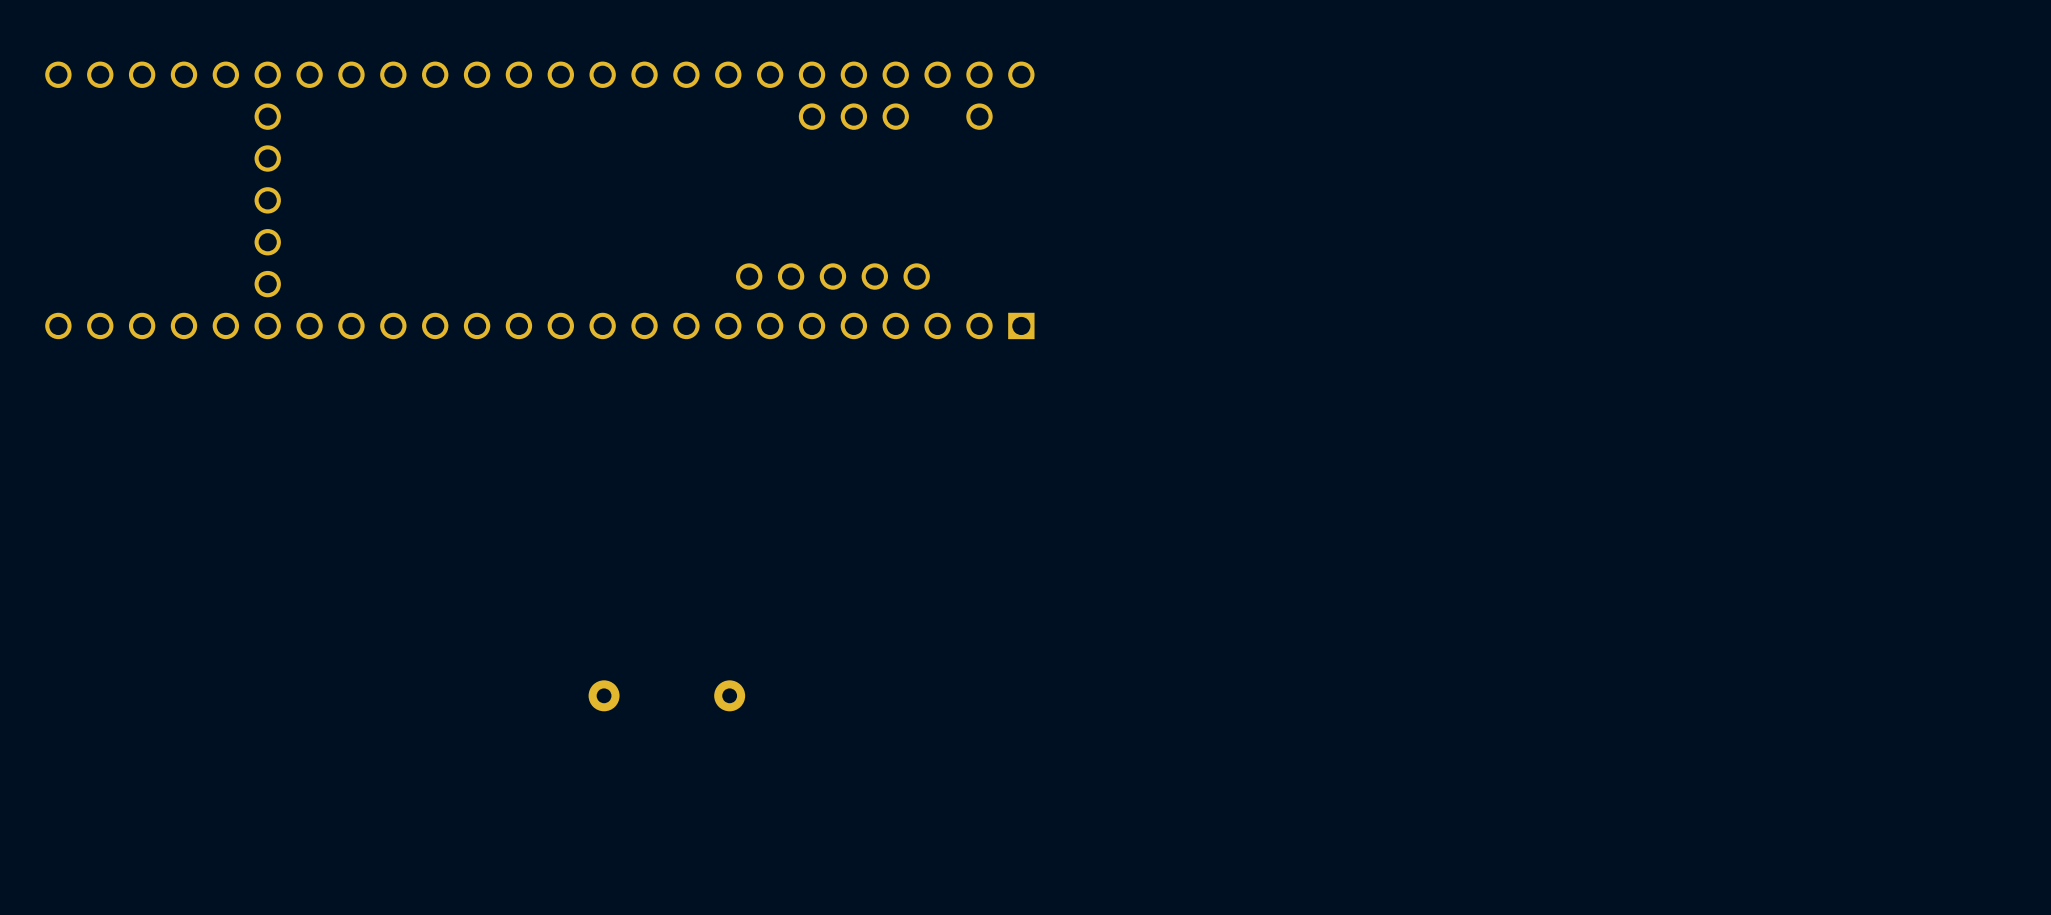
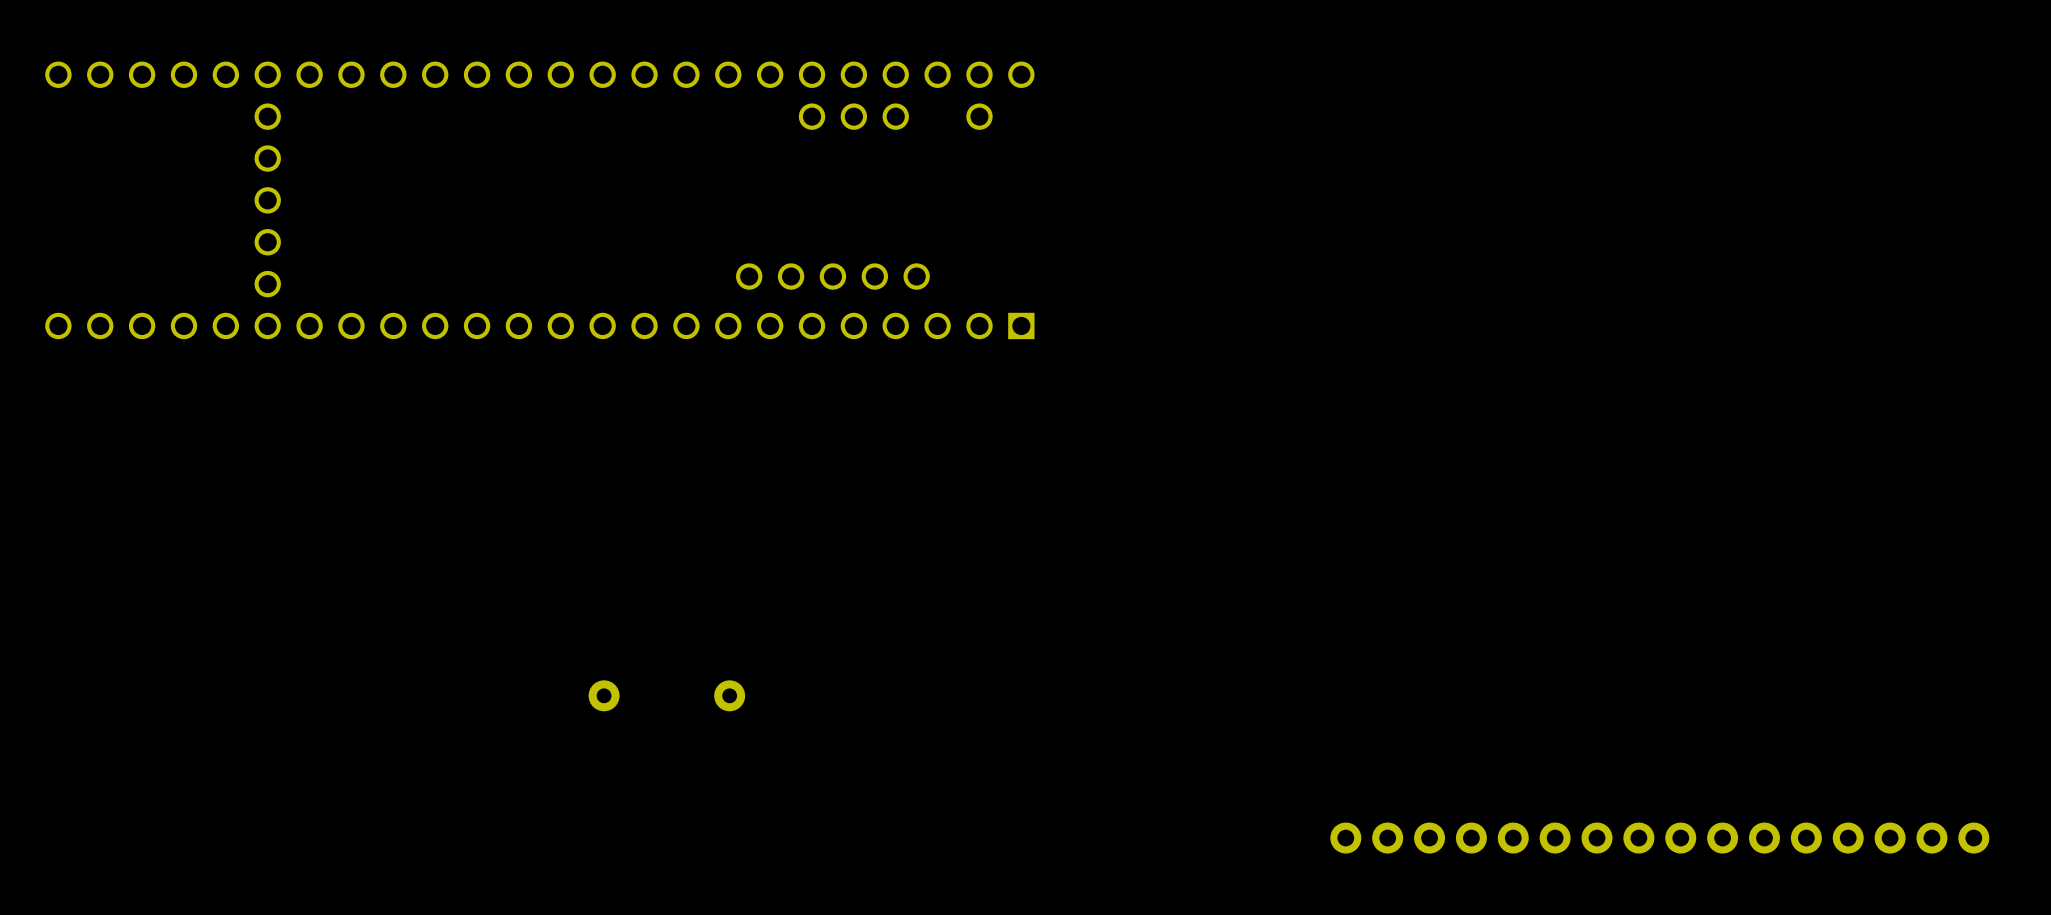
part: none -> (1659, 838)

